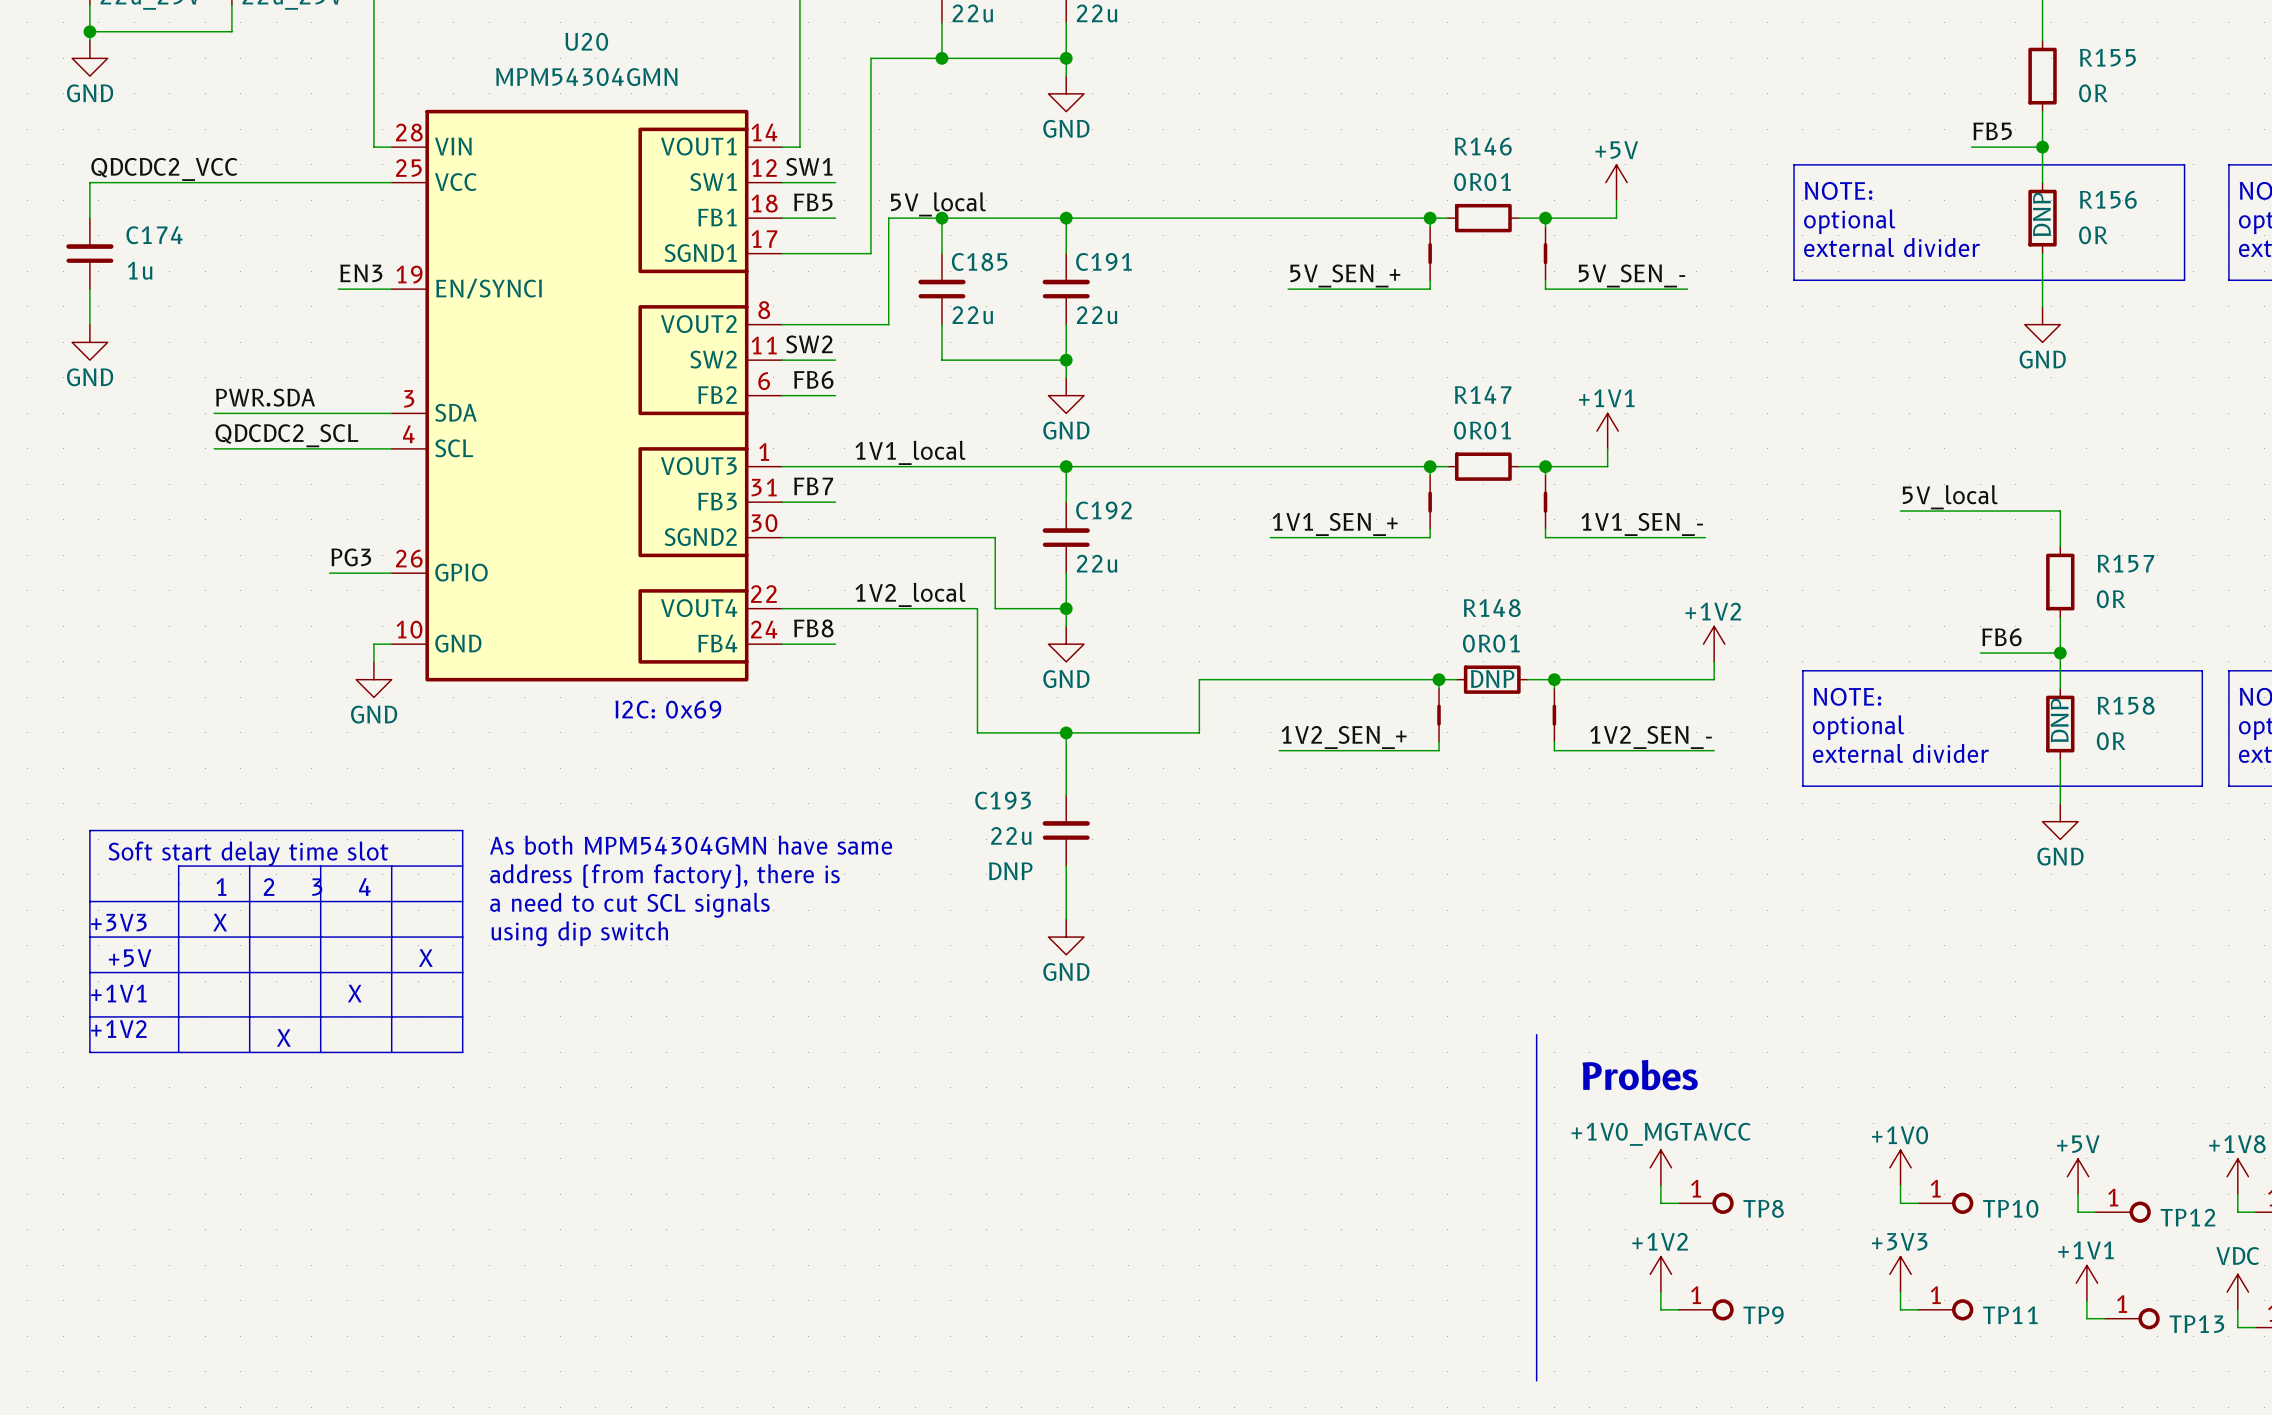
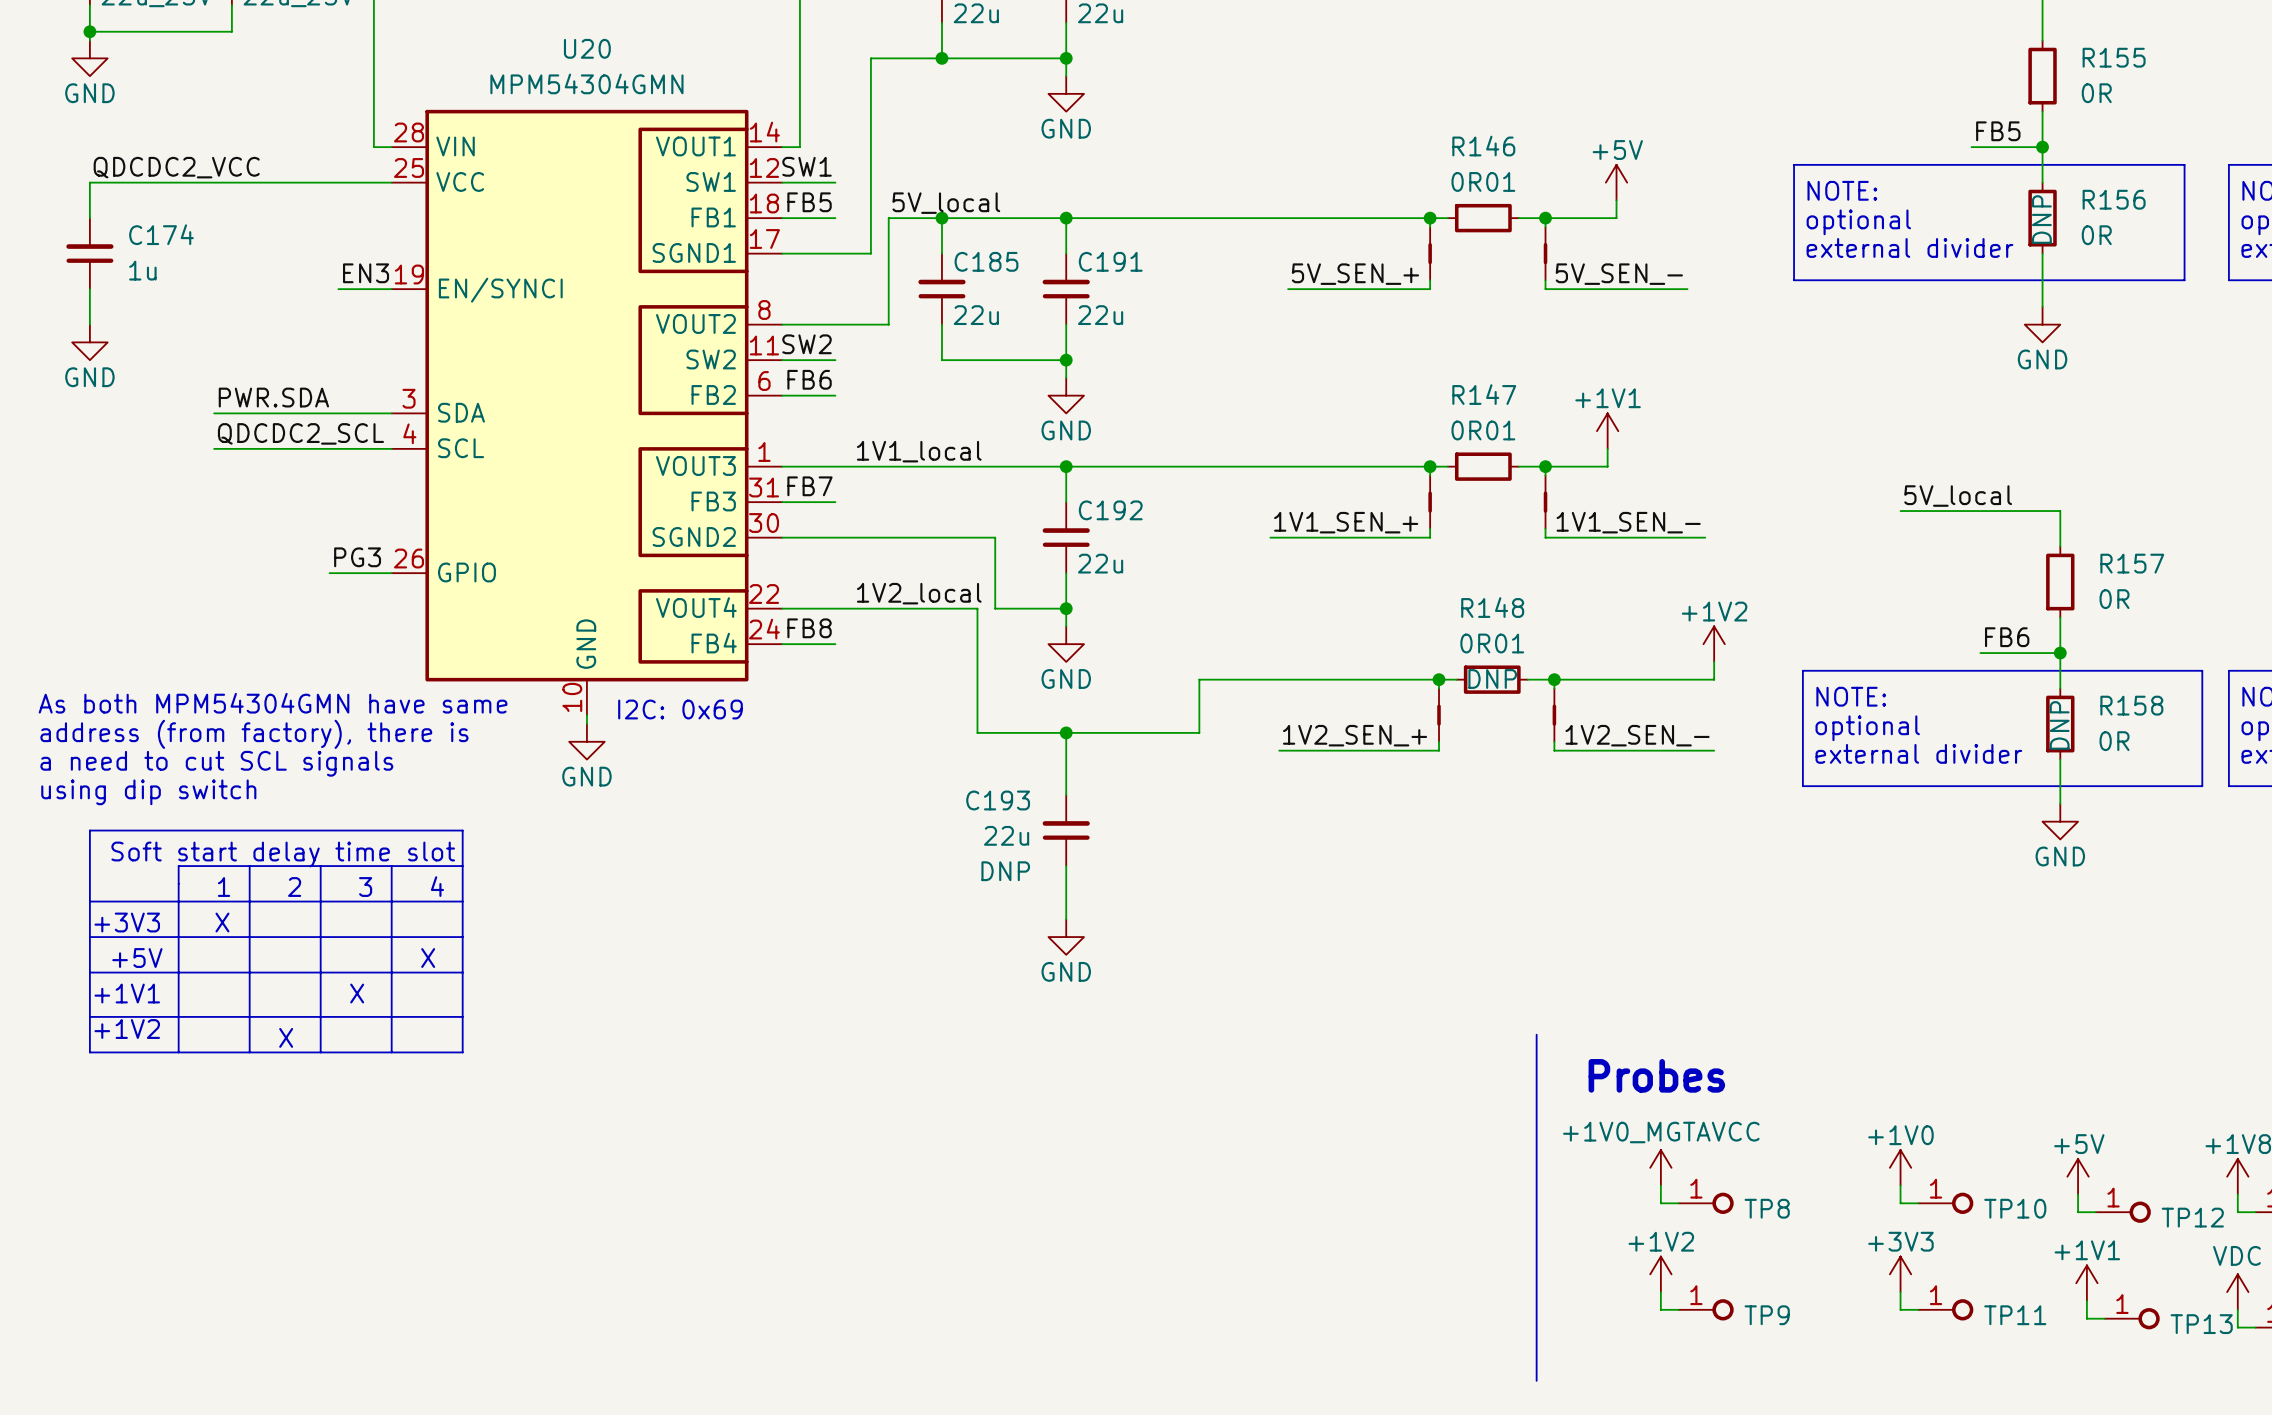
U20 symbol: [391, 92, 783, 682] -> [391, 92, 783, 716]
wire: (391, 644) (373, 644) (373, 661) -> none
power symbol position: GND (373, 679) -> GND (586, 741)
text: none -> As both MPM54304GMN have same (273, 703)
wire: none -> (586, 715) (586, 724)
text: none -> address (from factory), there is (254, 734)
text: none -> a need to cut SCL signals (216, 763)
text: none -> using dip switch (148, 792)
text: As both MPM54304GMN have same (691, 845) -> none
text: address (from factory), there is (664, 876) -> none
text: a need to cut SCL signals (629, 905) -> none
text: using dip switch (579, 933) -> none

